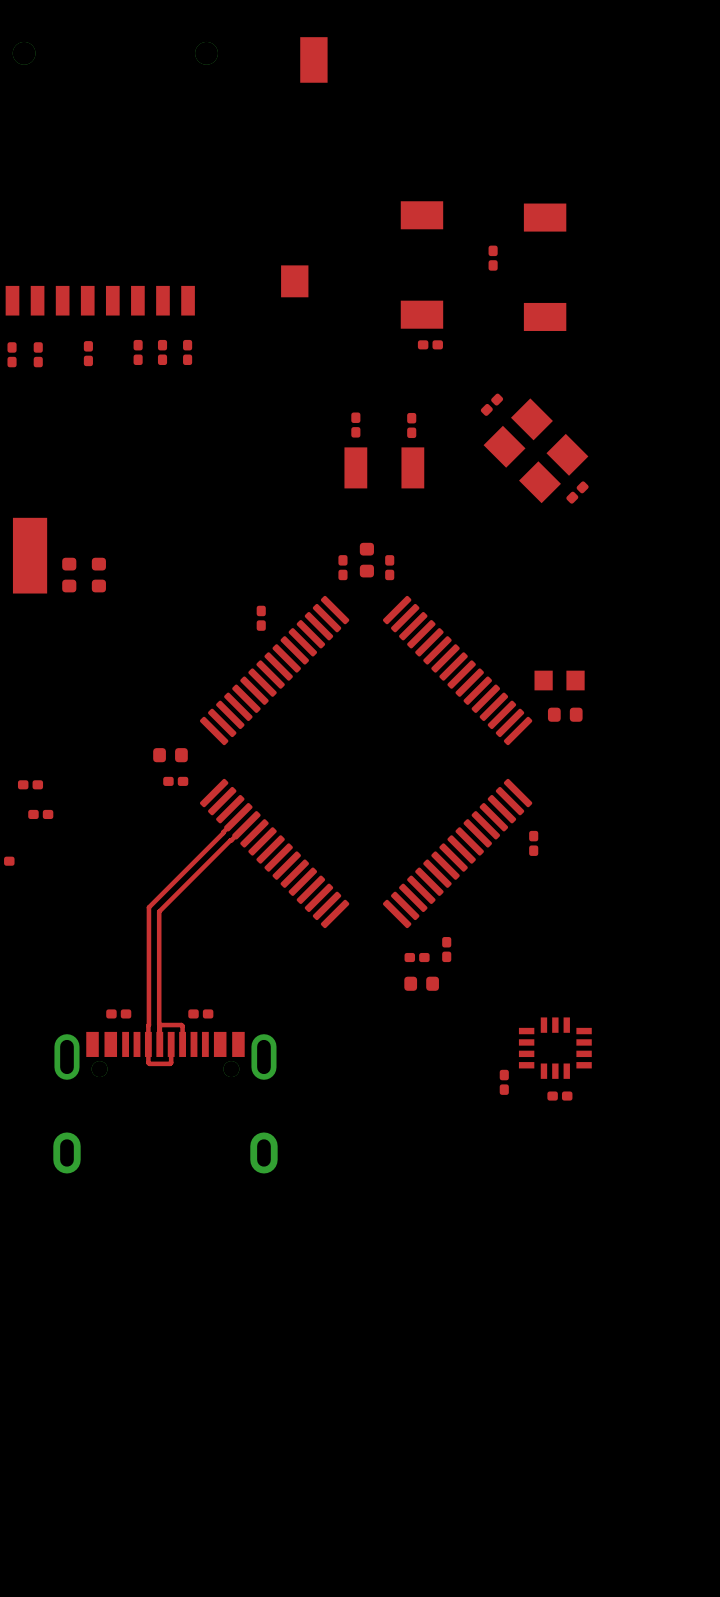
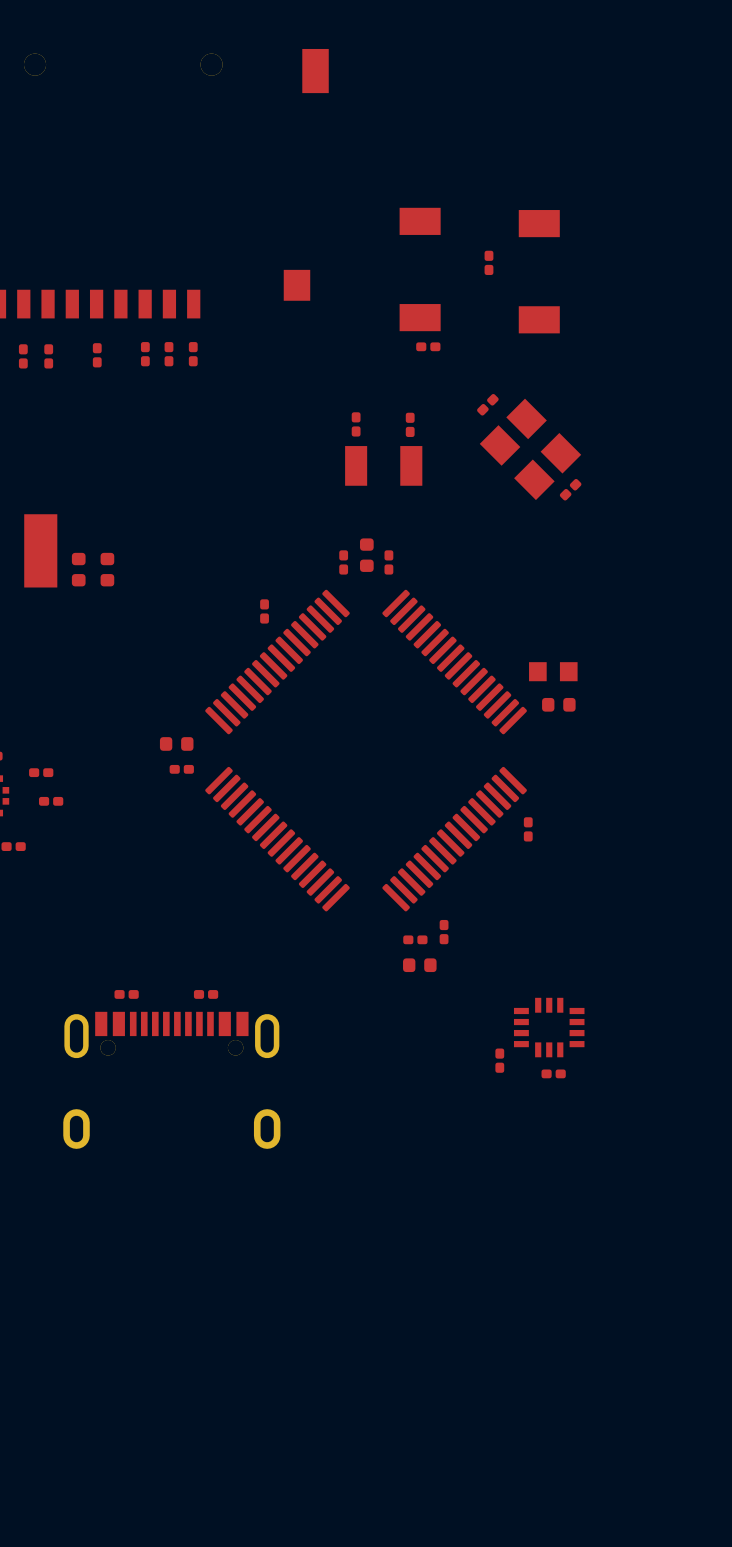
top track: (238, 817) (148, 907) (148, 1062) (170, 1063) (171, 1044) -> none
top track: (246, 825) (159, 911) (159, 1044) -> none
top track: (159, 1026) (181, 1025) (182, 1044) -> none

